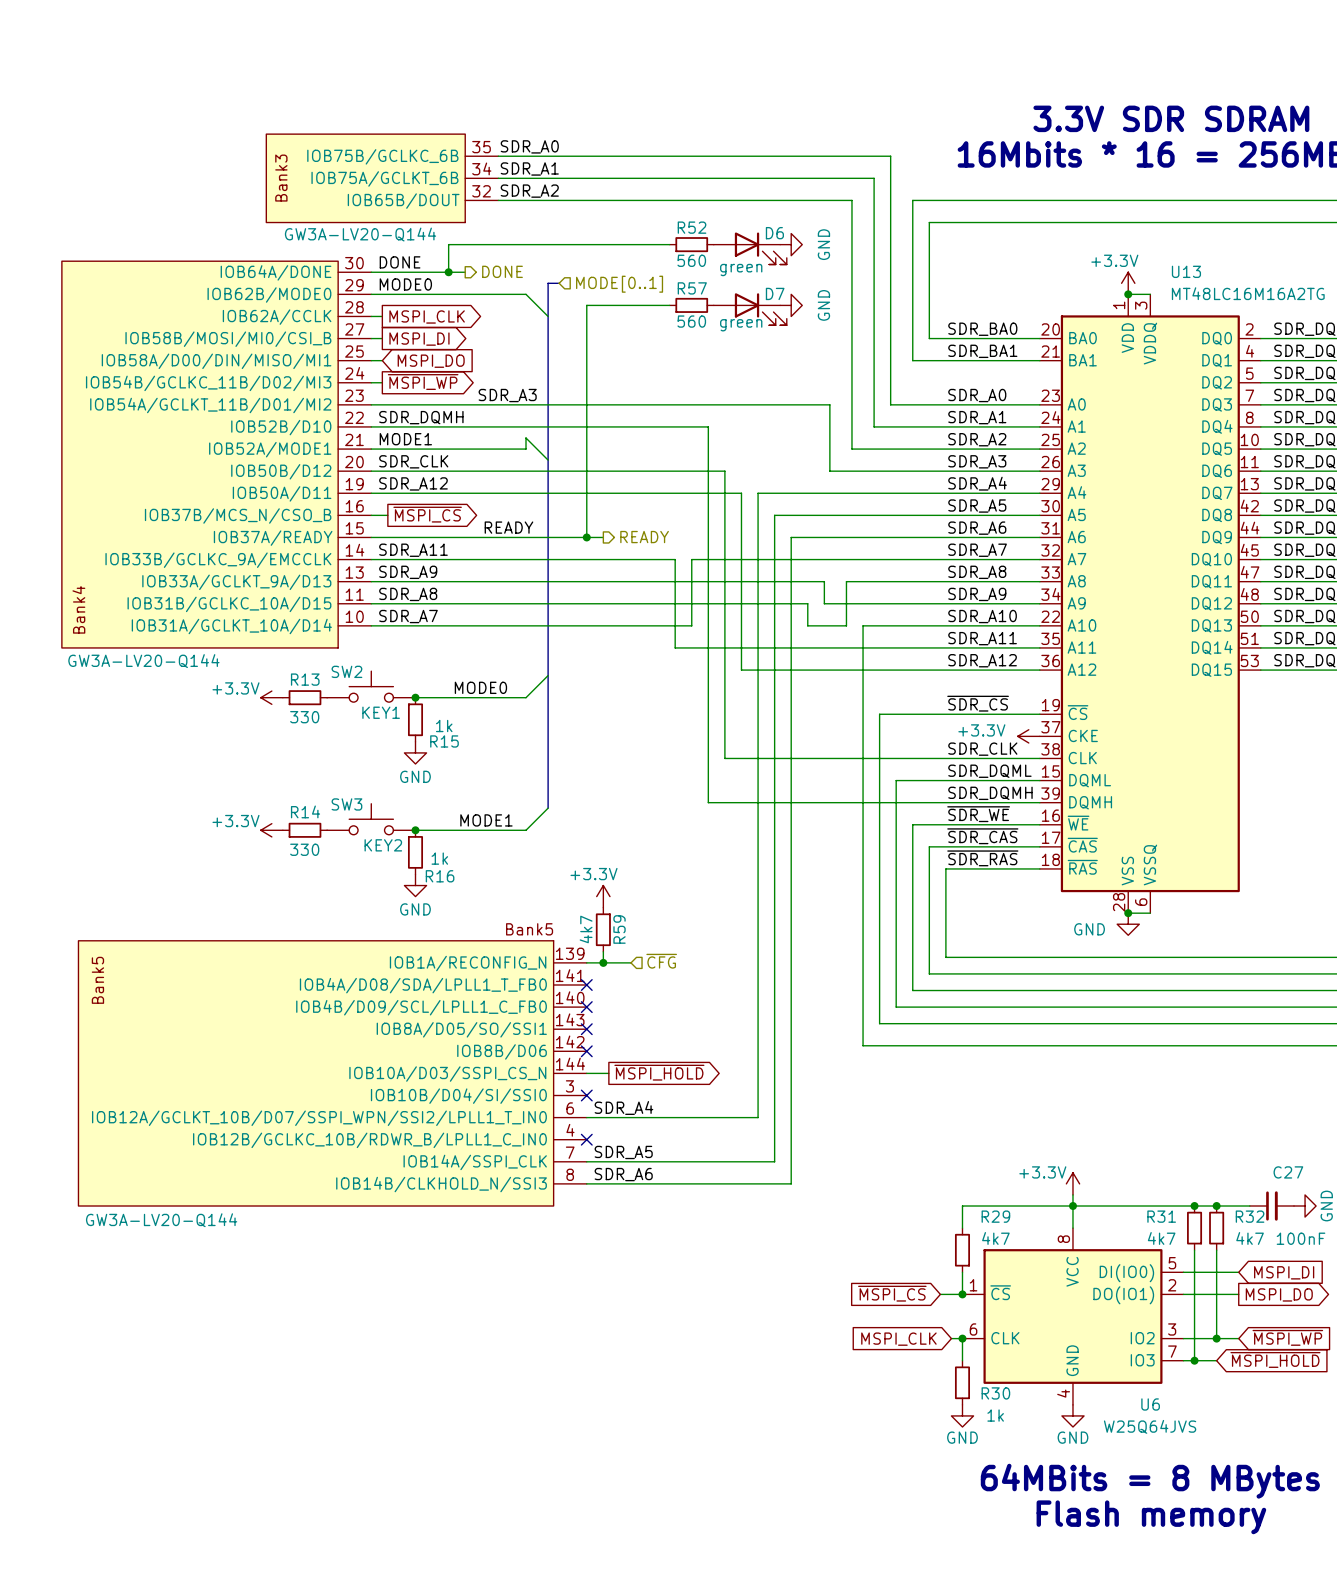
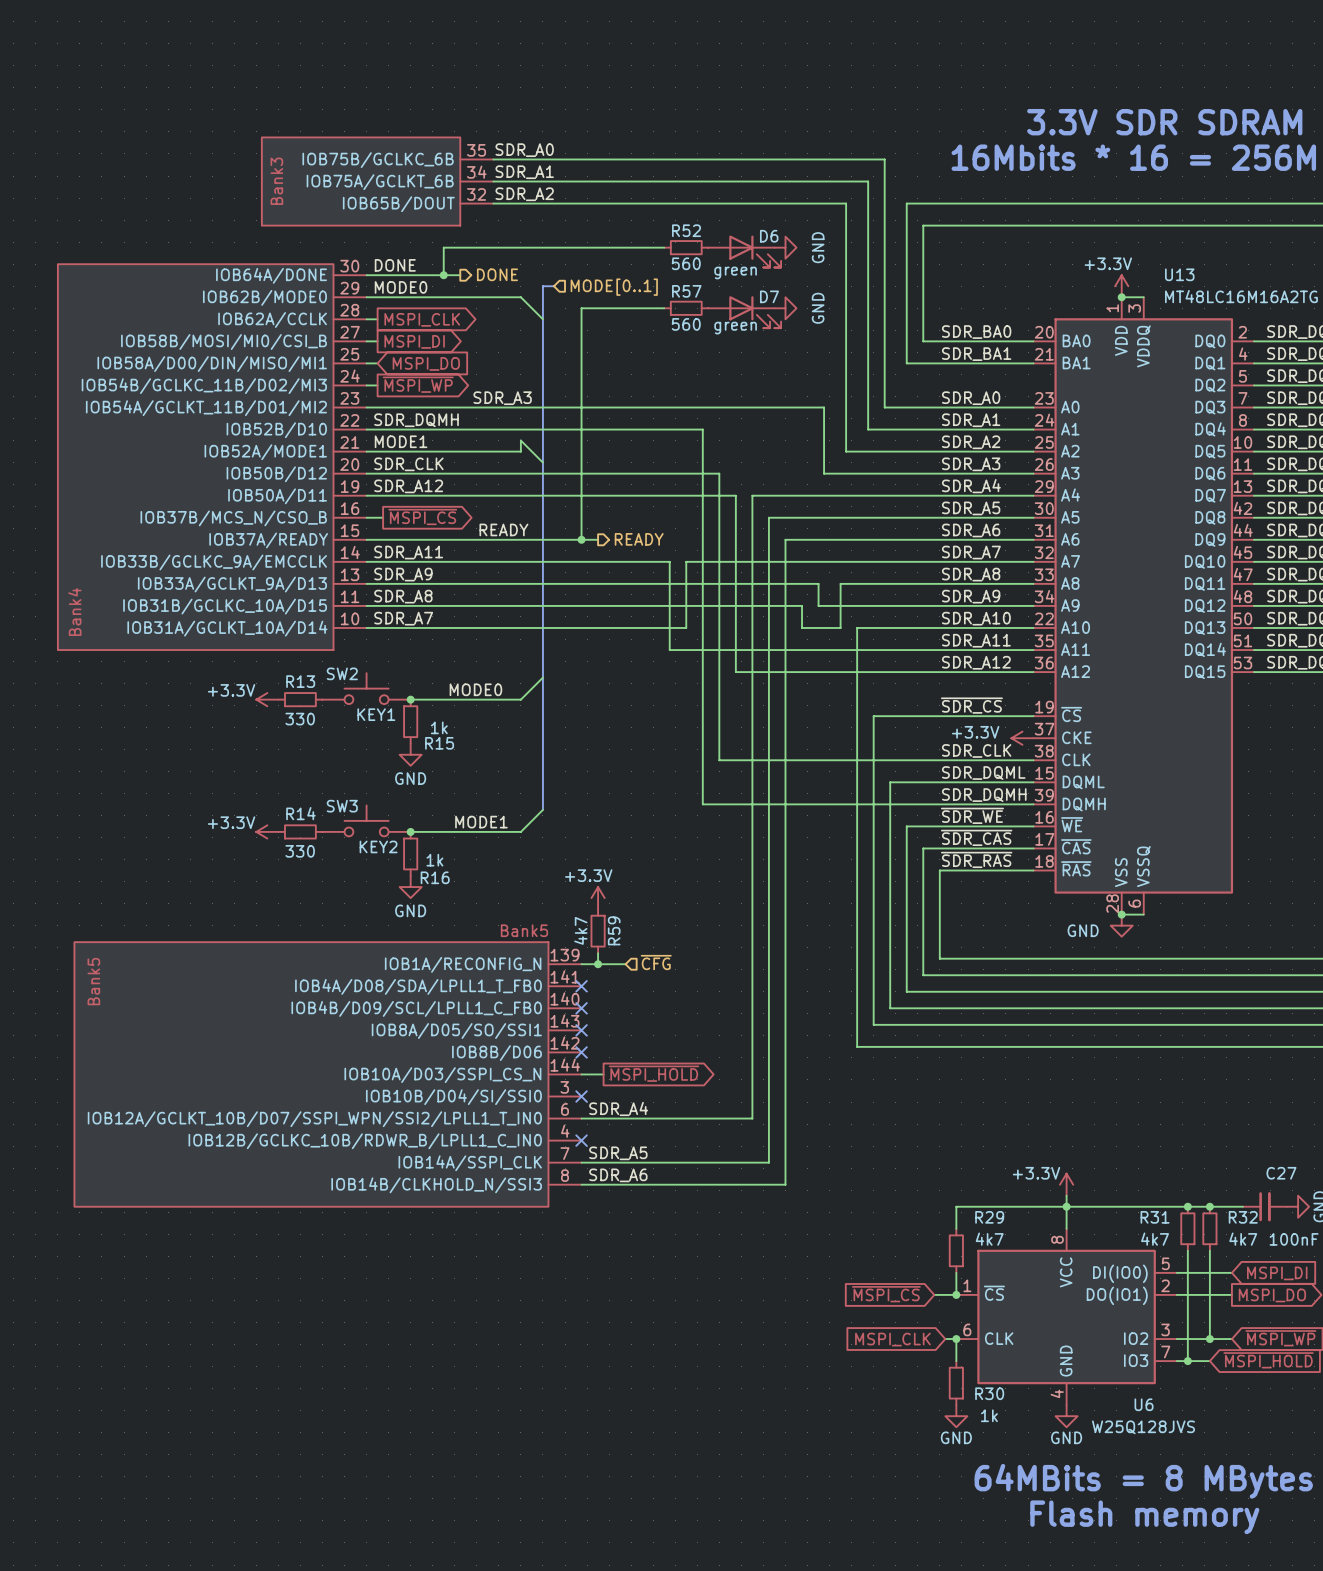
part value: GW3A-LV20-Q144 (360, 234) -> none
part value: GW3A-LV20-Q144 (143, 661) -> none
part value: GW3A-LV20-Q144 (161, 1220) -> none
U6 value: W25Q64JVS (1150, 1426) -> W25Q128JVS (1143, 1427)

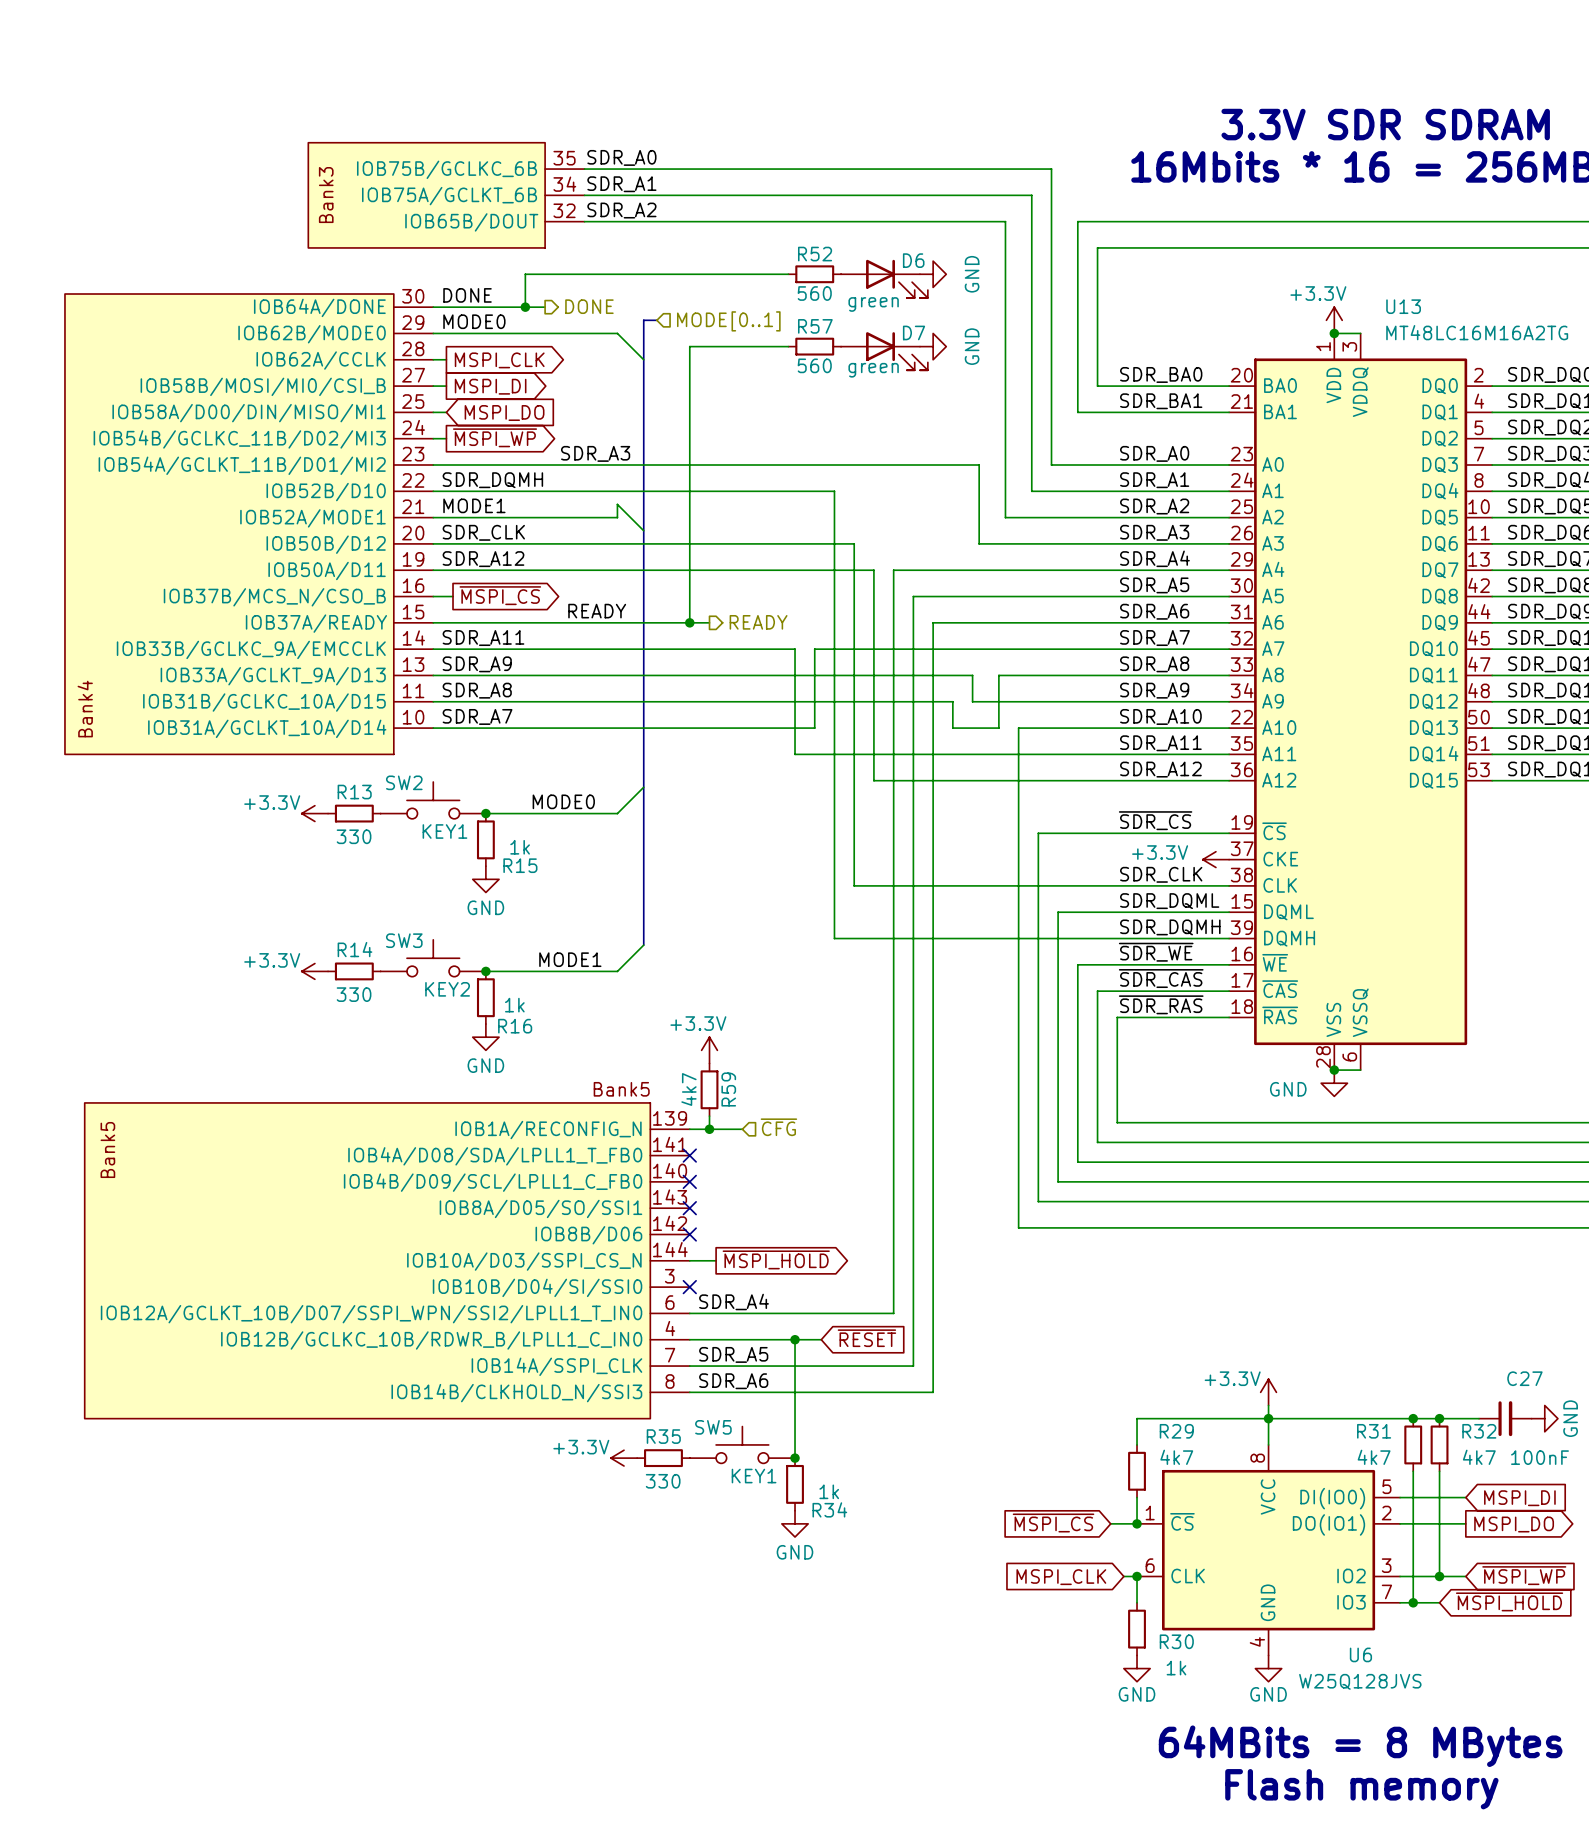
global label: none -> ~{RESET} (866, 1338)
wire: none -> (689, 1339) (821, 1339)
no-connect mark: (581, 1140) -> none
wire: none -> (795, 1339) (795, 1458)
junction: none -> (795, 1339)
SW5: none -> KEY1 (742, 1444)
power symbol: none -> +3.3V (624, 1458)
R35: none -> 330 (663, 1458)
junction: none -> (795, 1458)
R34: none -> 1k (795, 1484)
power symbol: none -> GND (795, 1523)

